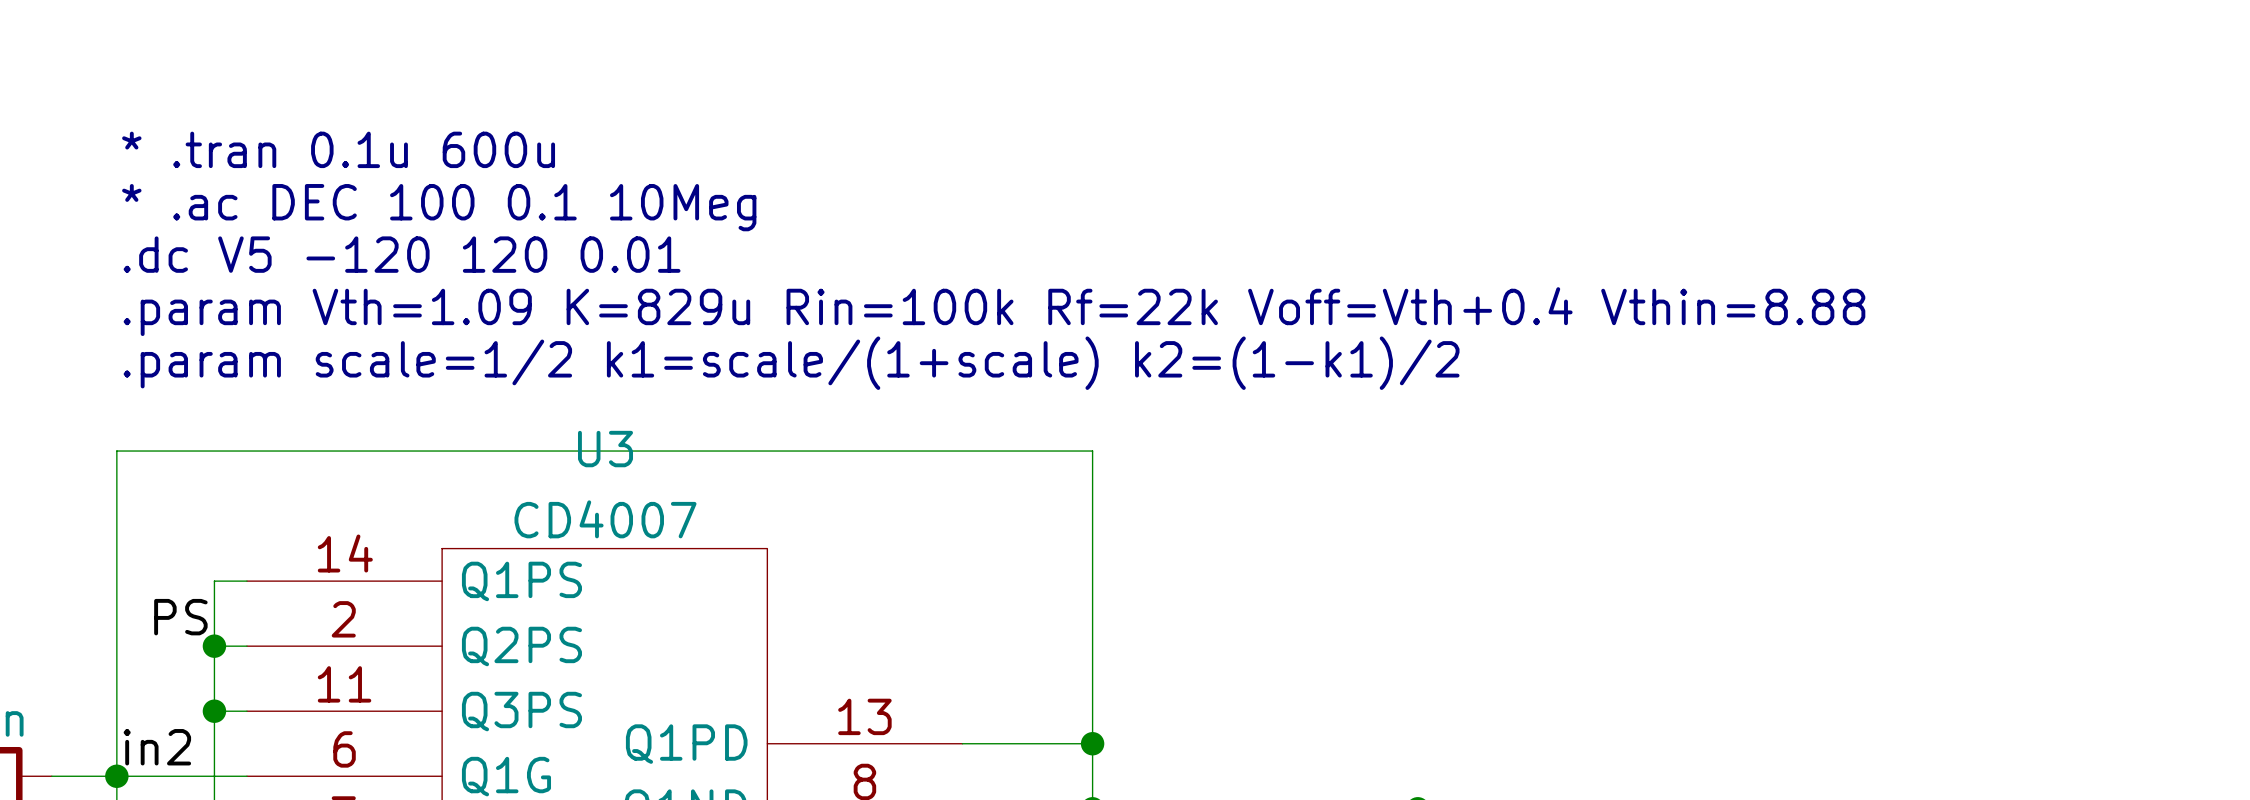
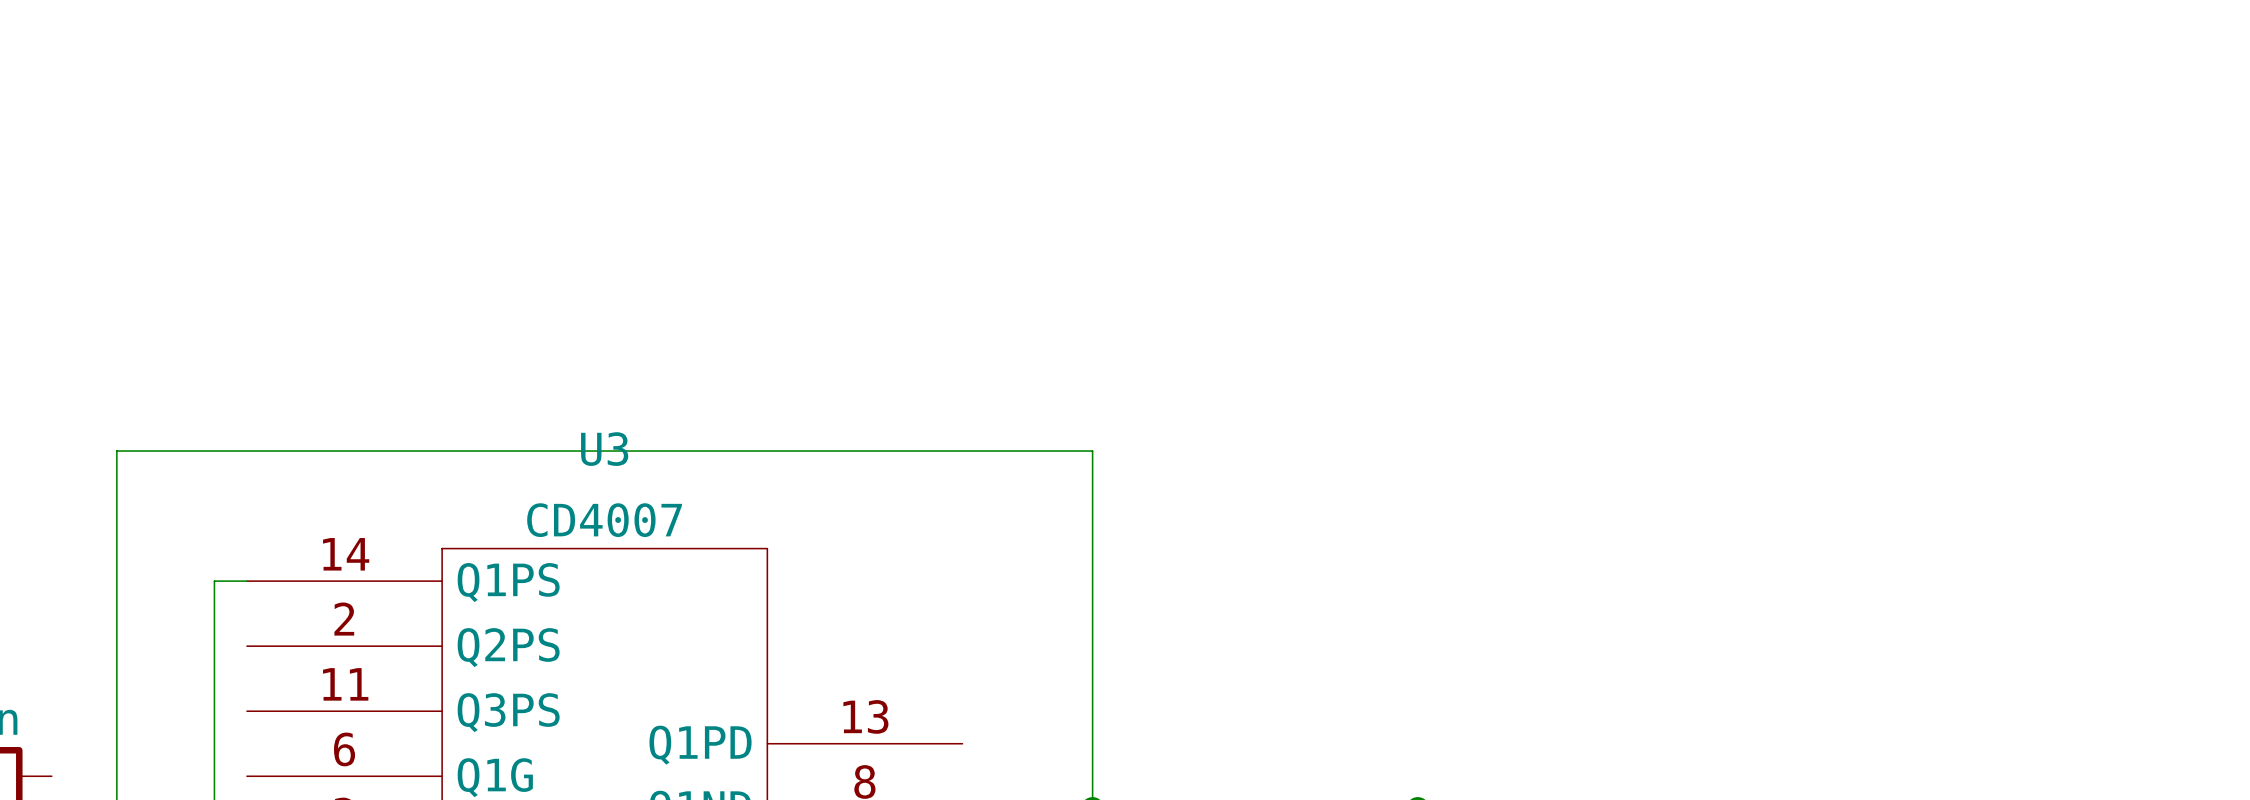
text: * .tran 0.1u 600u (338, 149) -> none
text: * .ac DEC 100 0.1 10Meg (439, 207) -> none
text: .dc V5 -120 120 0.01 (402, 254) -> none
text: .param Vth=1.09 K=829u Rin=100k Rf=22k Voff=Vth+0.4 Vthin=8.88 (994, 311) -> none
text: .param scale=1/2 k1=scale/(1+scale) k2=(1-k1)/2 (791, 363) -> none
label: PS (180, 617) -> none
wire: (214, 646) (246, 646) -> none
junction: (214, 646) -> none
wire: (214, 711) (246, 711) -> none
junction: (214, 711) -> none
wire: (962, 743) (1092, 743) -> none
junction: (1092, 743) -> none
label: in2 (157, 747) -> none
wire: (51, 776) (246, 776) -> none
junction: (116, 776) -> none

